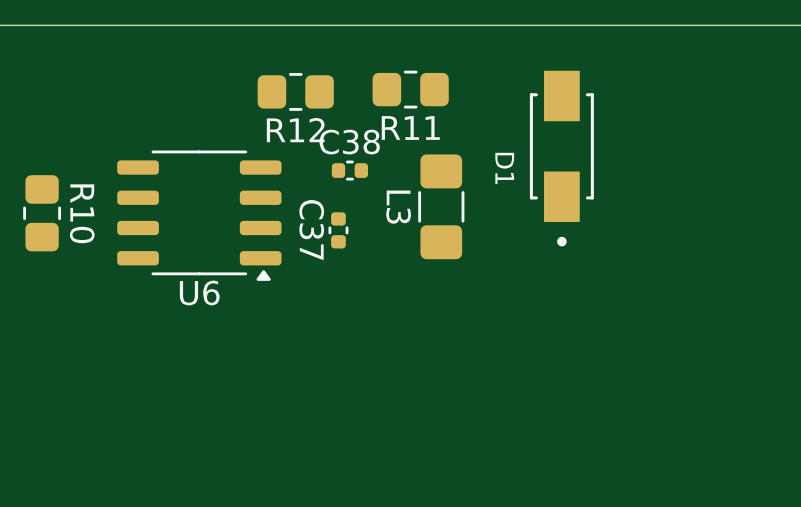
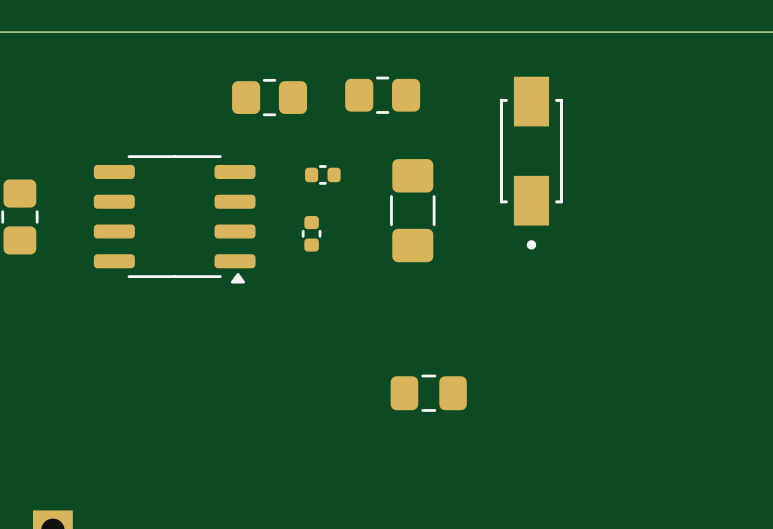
R11 name: R11 (410, 127) -> none
R12 name: R12 (295, 130) -> none
C38 name: C38 (349, 142) -> none
D1 name: D1 (504, 168) -> none
L3 name: L3 (398, 207) -> none
R10 name: R10 (82, 213) -> none
C37 name: C37 (311, 229) -> none
U6 name: U6 (199, 292) -> none
part: none -> (428, 393)

